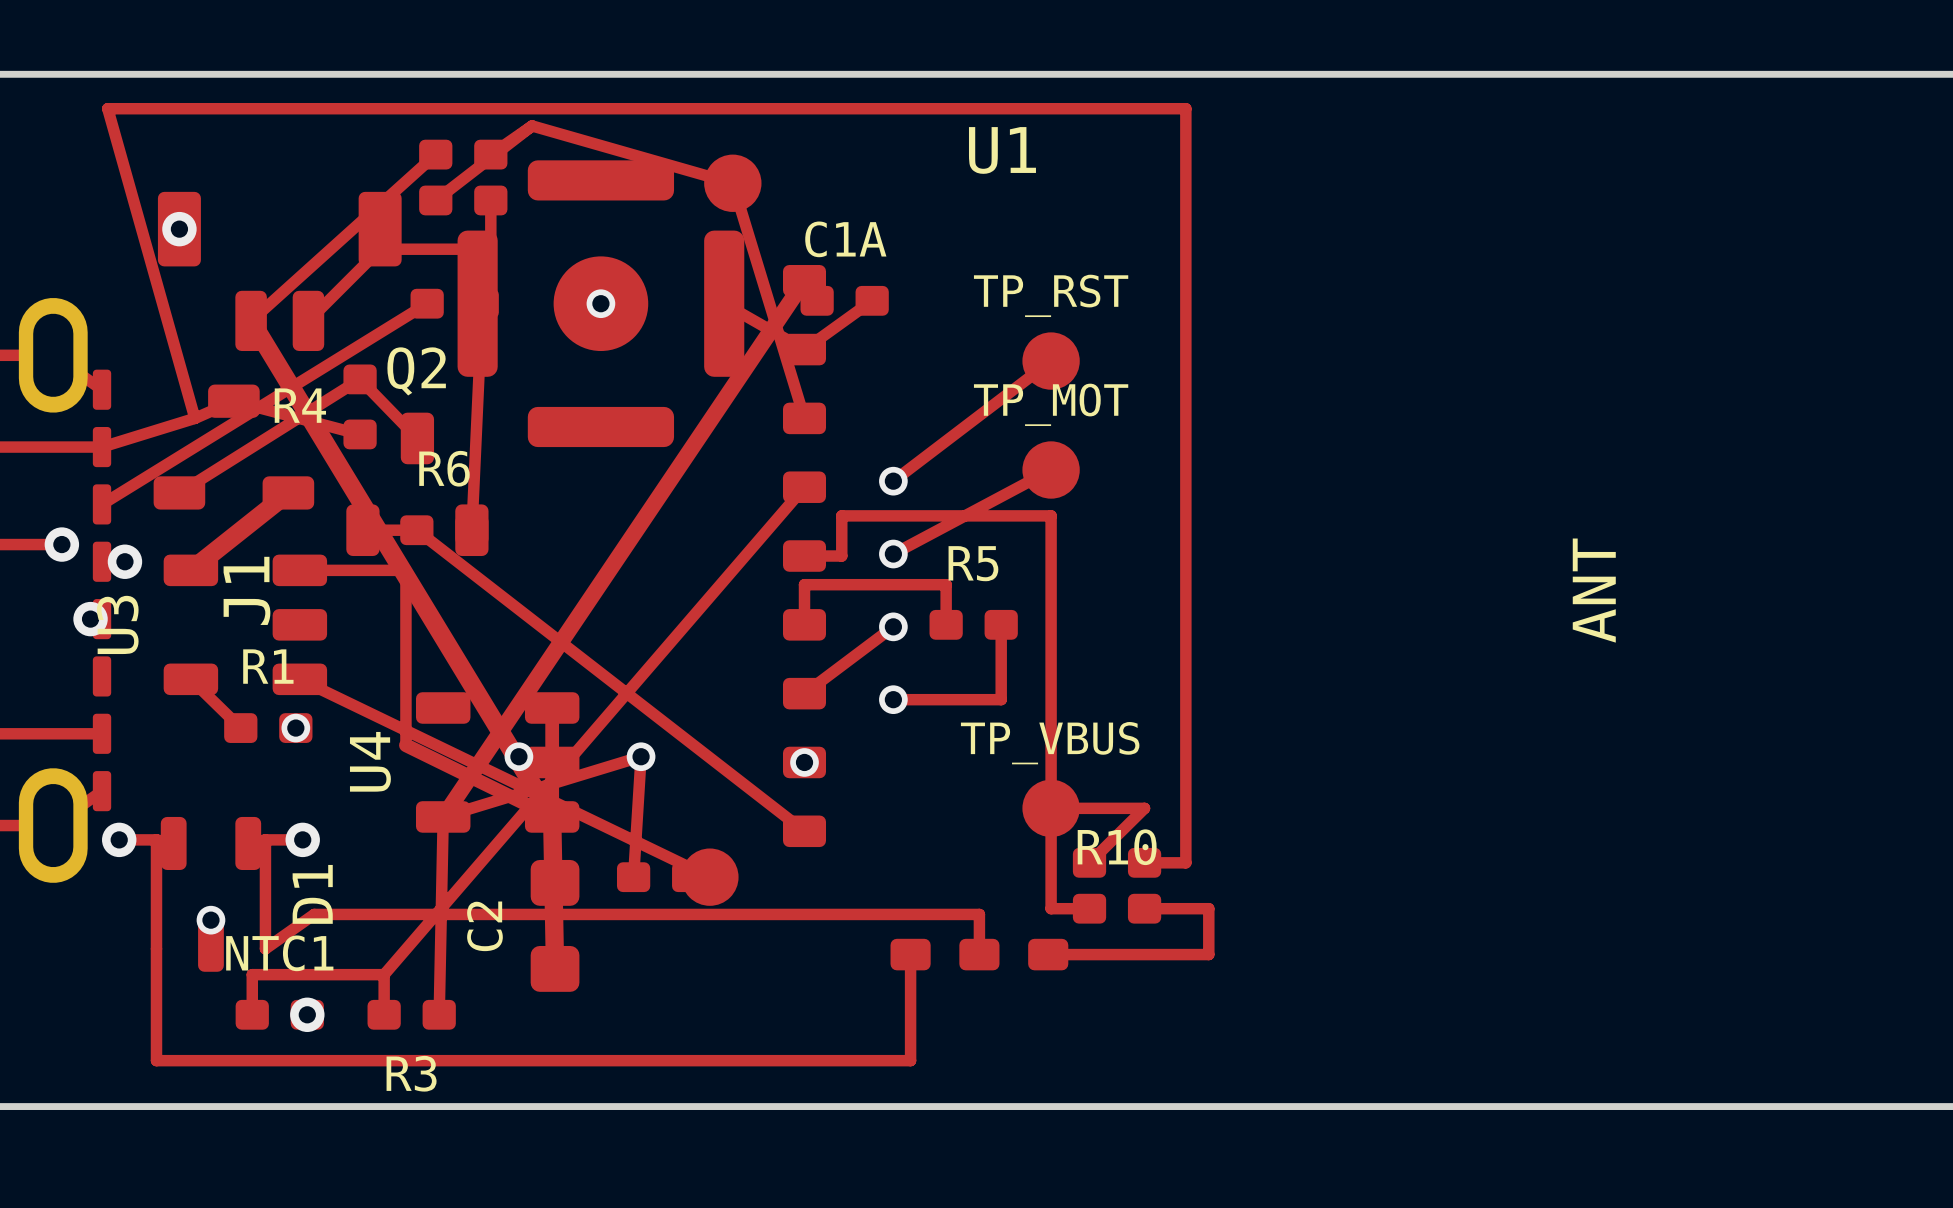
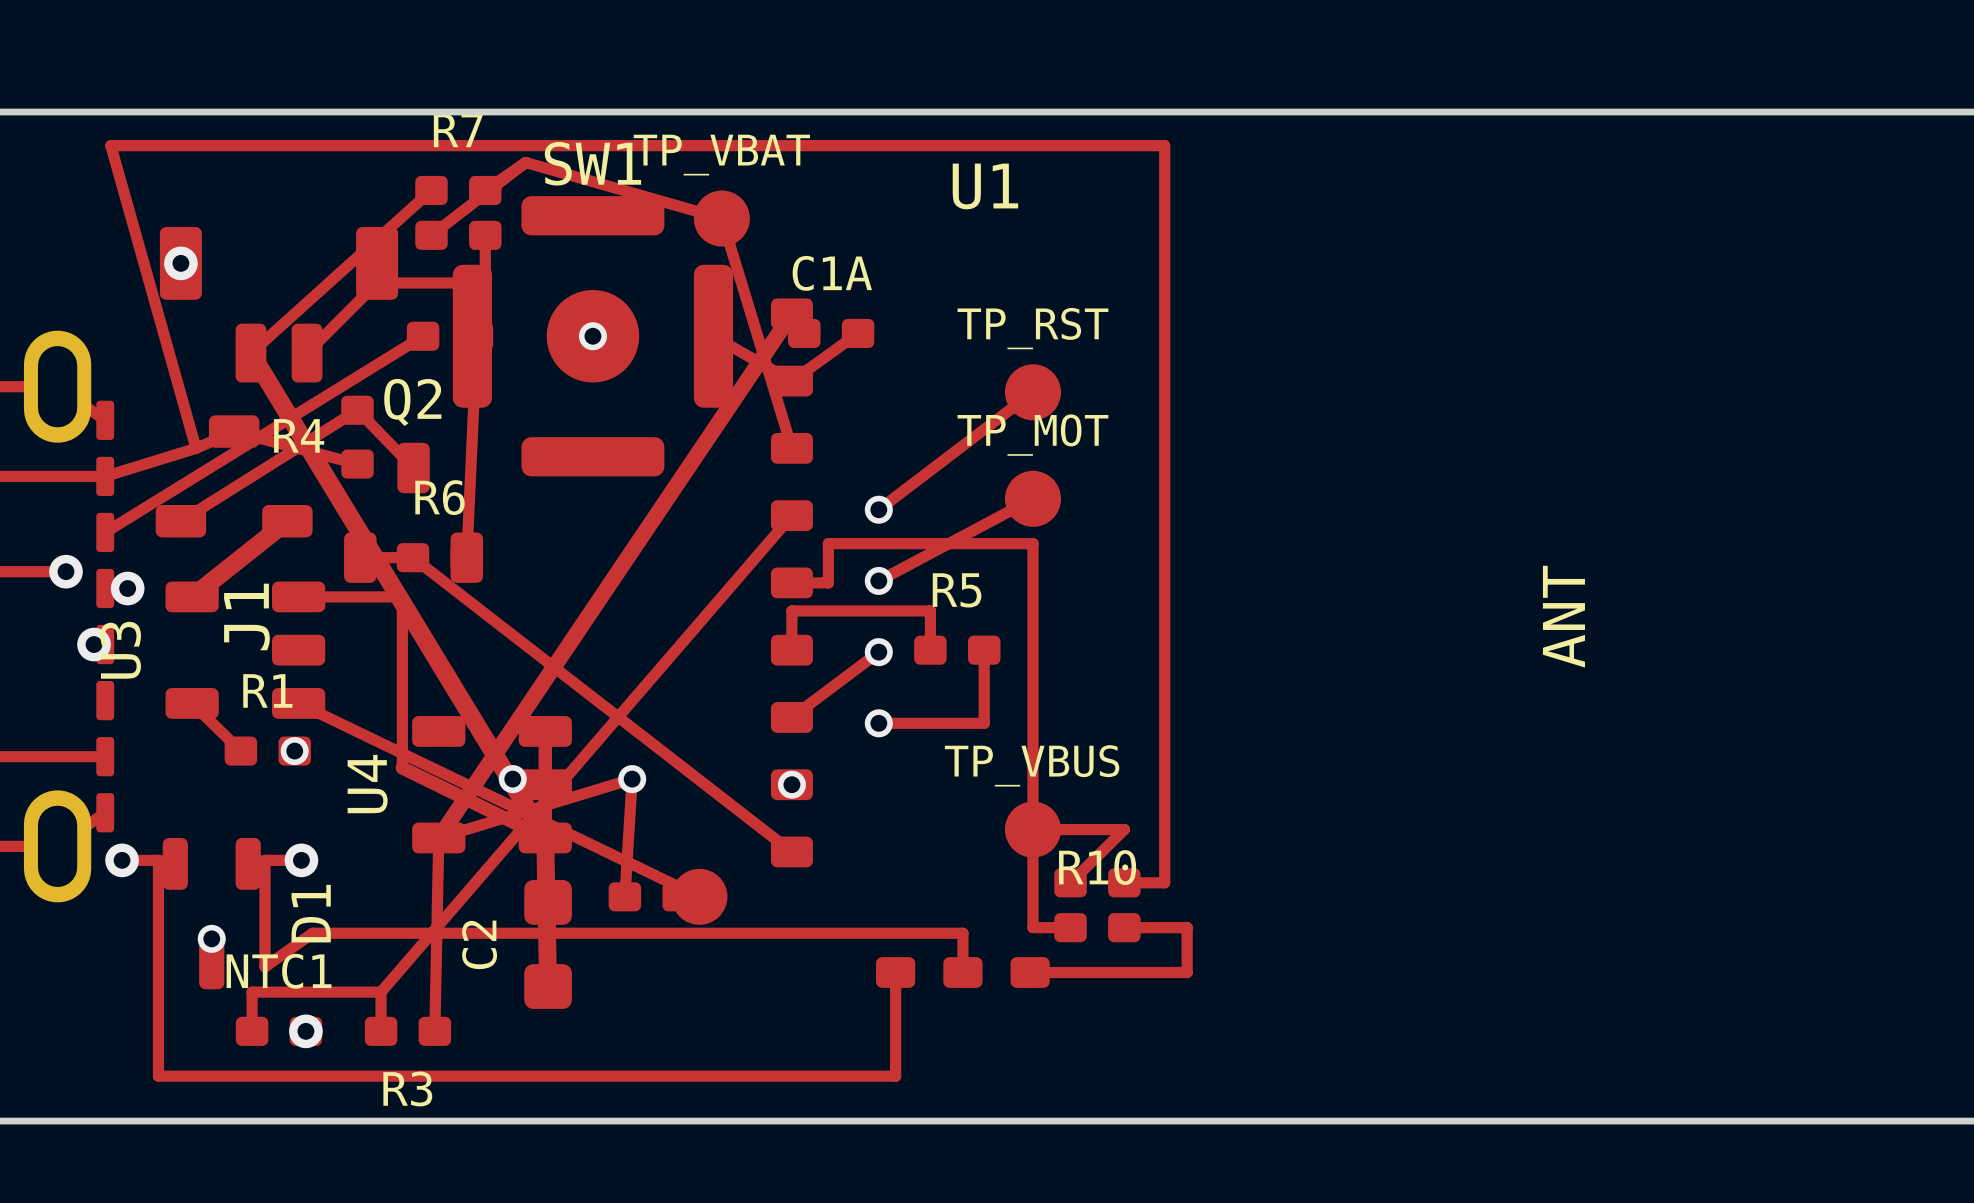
R7 name: none -> R7 (458, 130)
TP_VBAT name: none -> TP_VBAT (721, 155)
SW1 name: none -> SW1 (592, 163)

